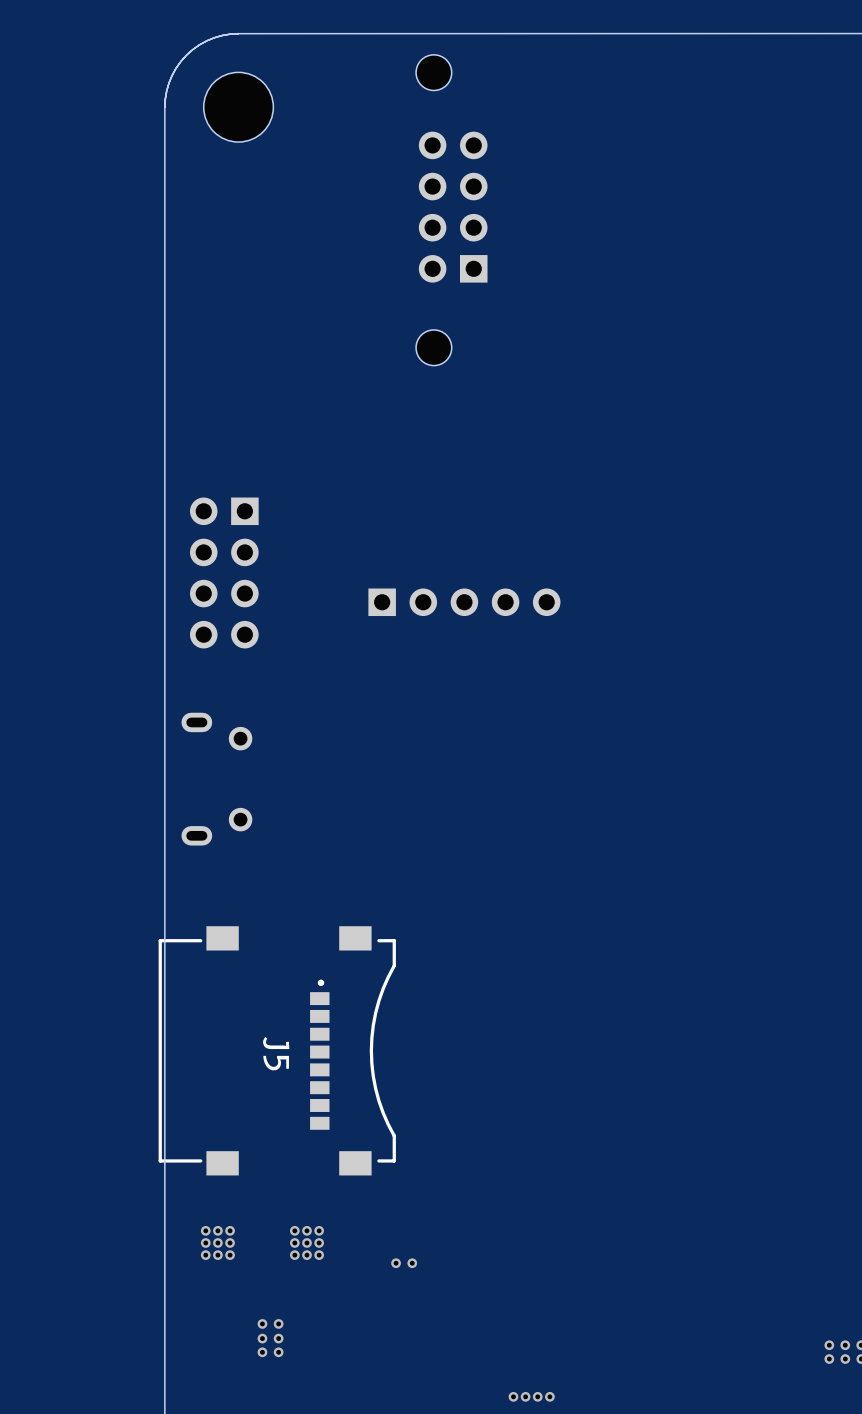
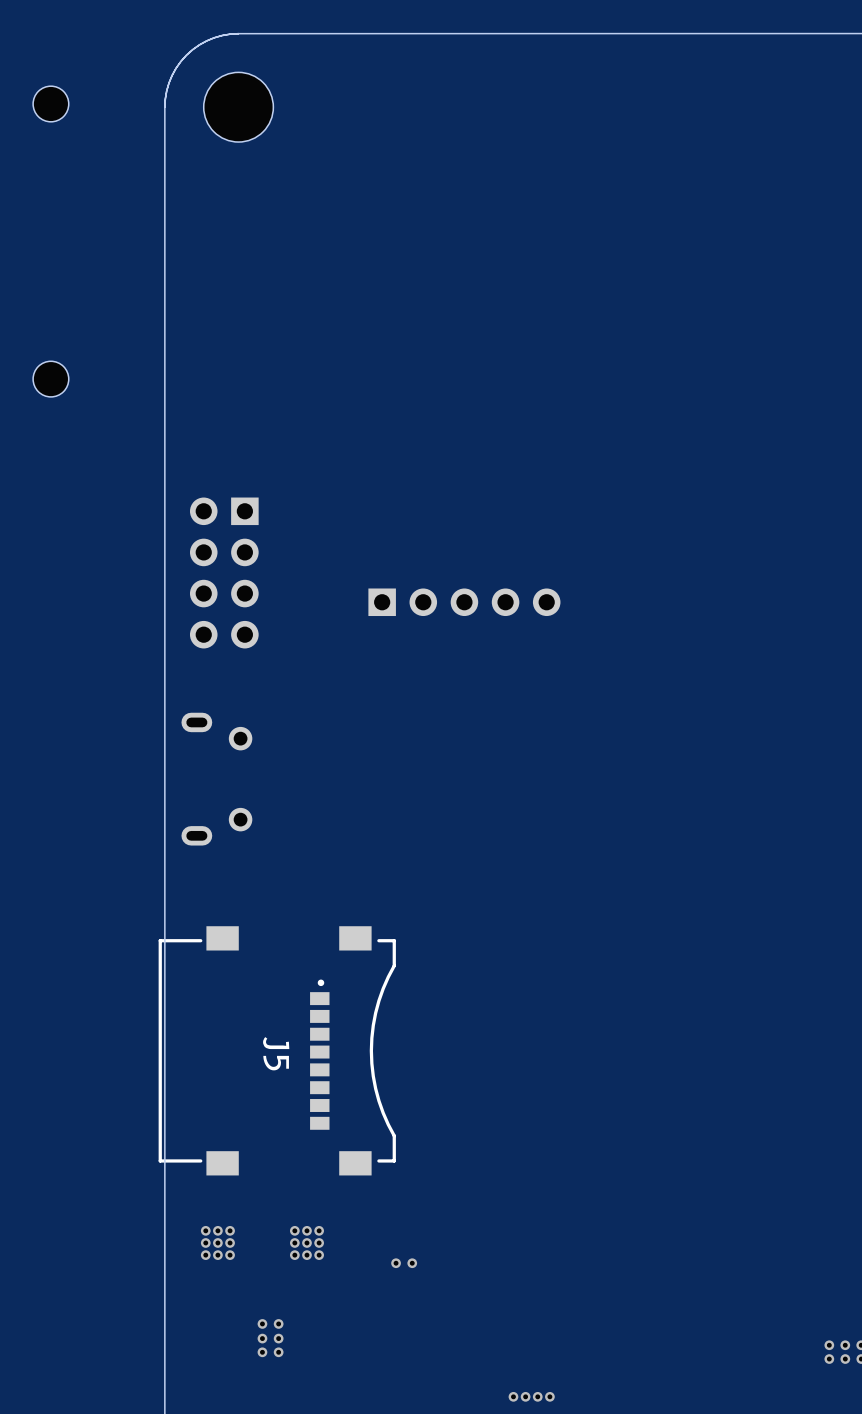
part: (433, 72) -> none
part: none -> (50, 104)
part: (453, 207) -> none
part: (433, 347) -> none
part: none -> (50, 379)

